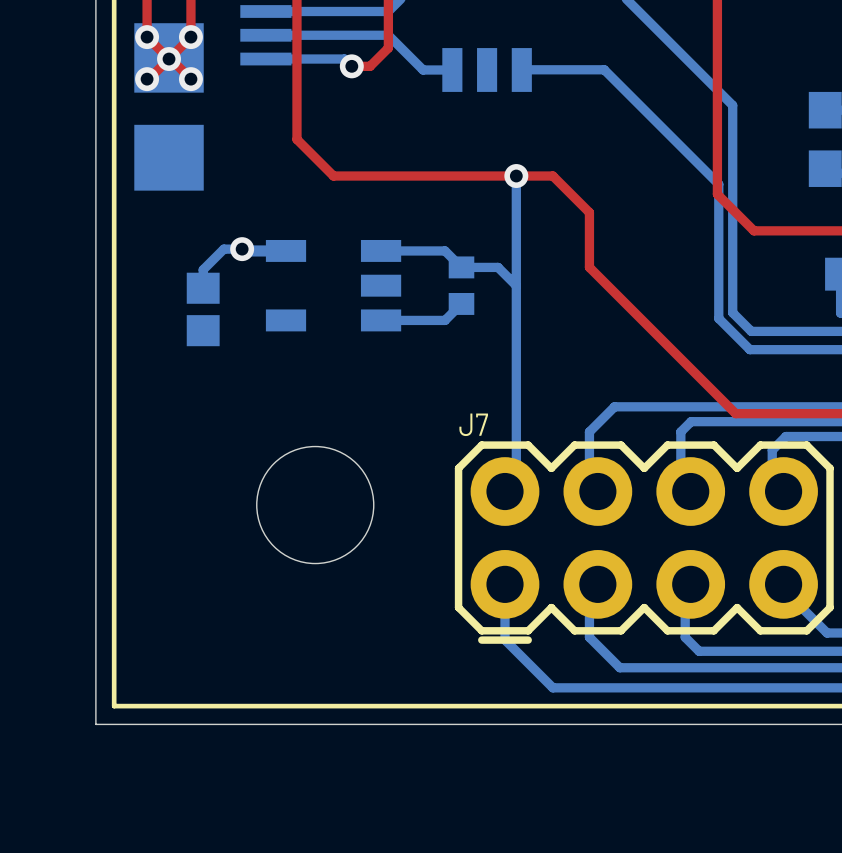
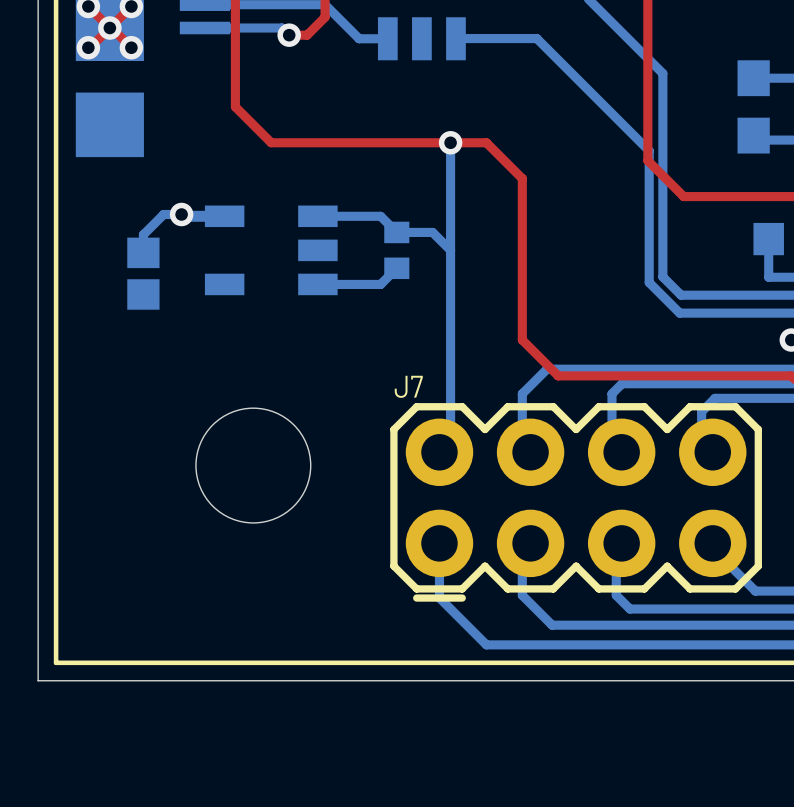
top track: (589, 267) (735, 413) -> (522, 232) (522, 340) (558, 375) (665, 375)

